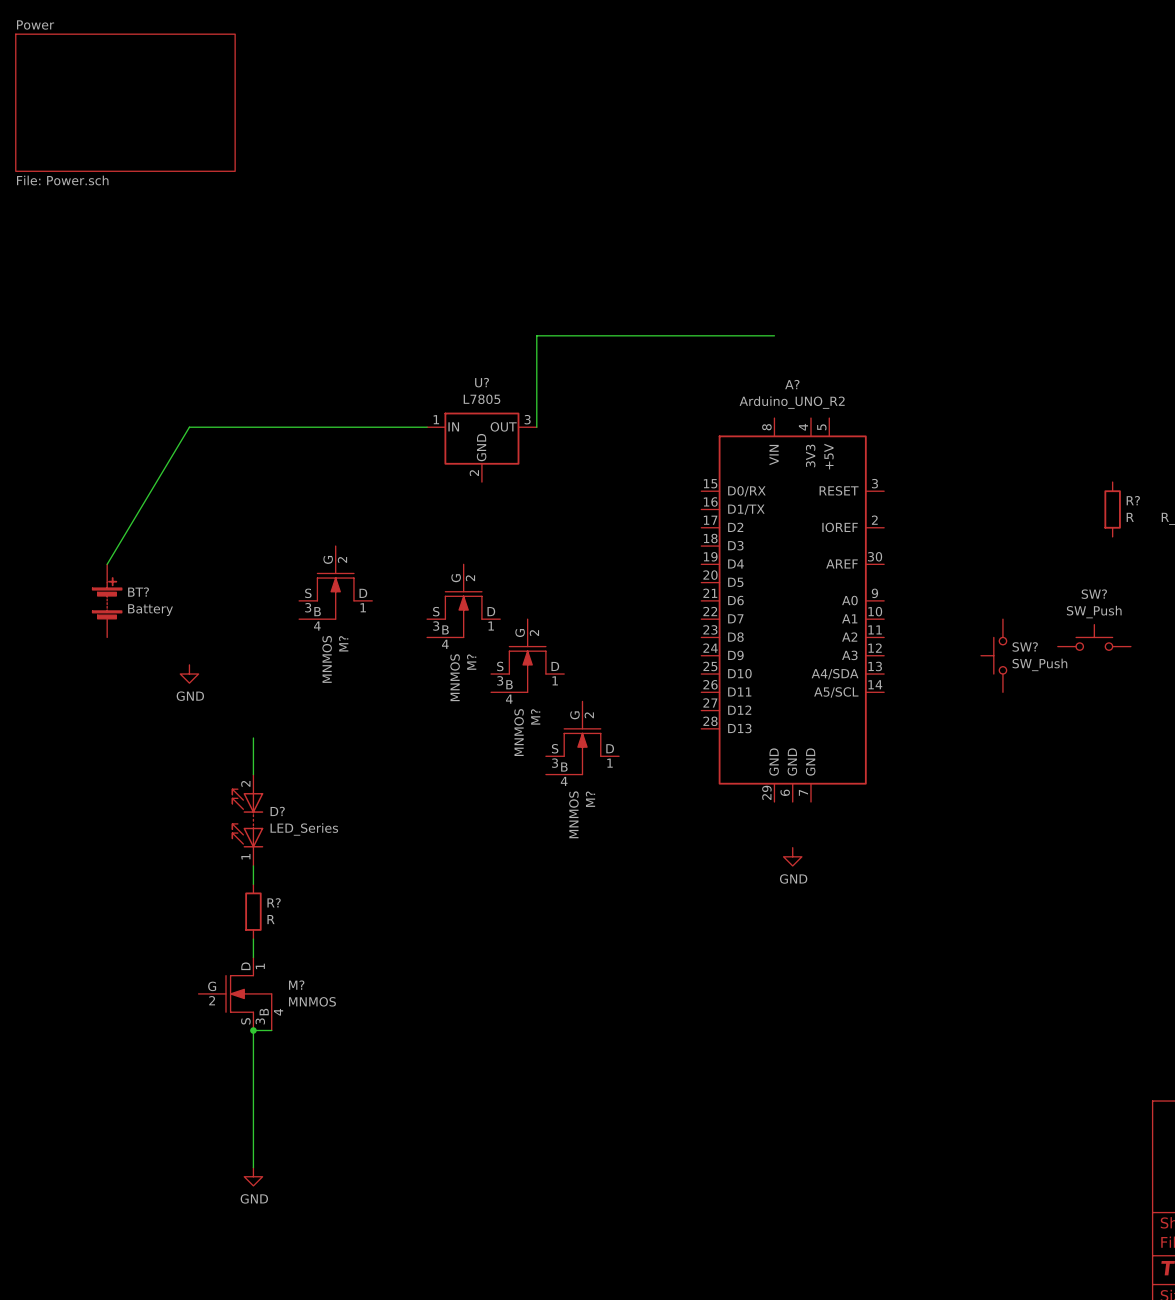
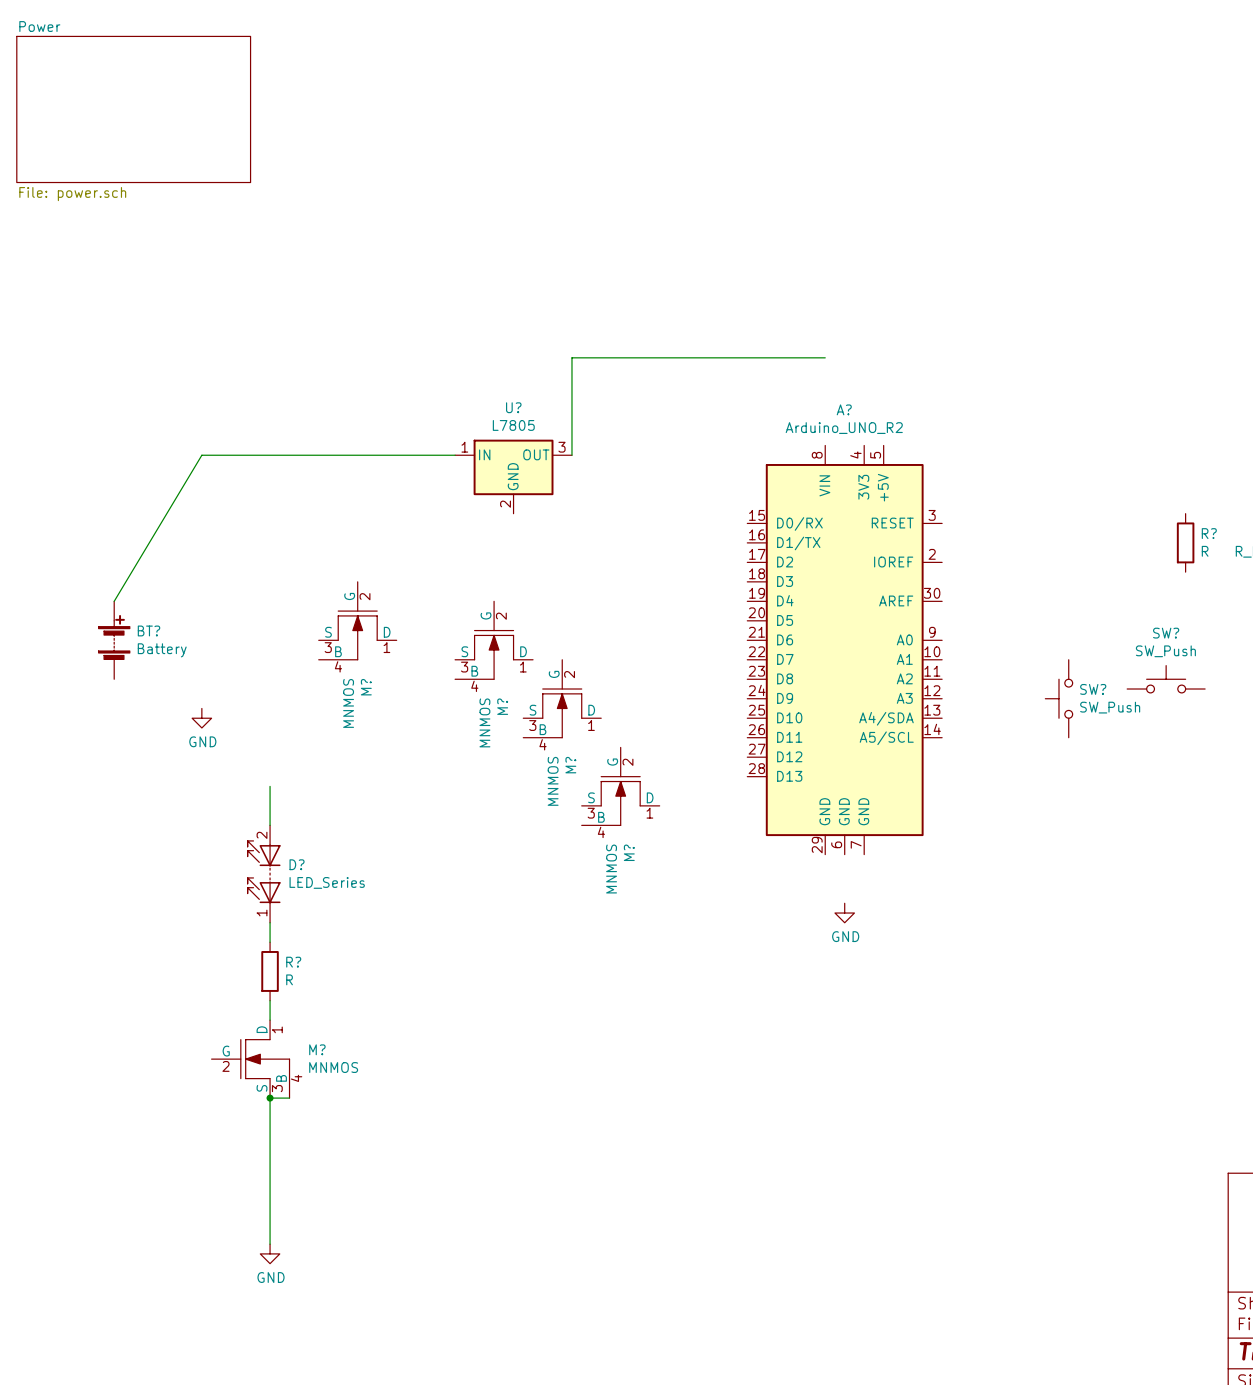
sheet Power value: File: Power.sch (62, 180) -> File: power.sch (72, 194)

